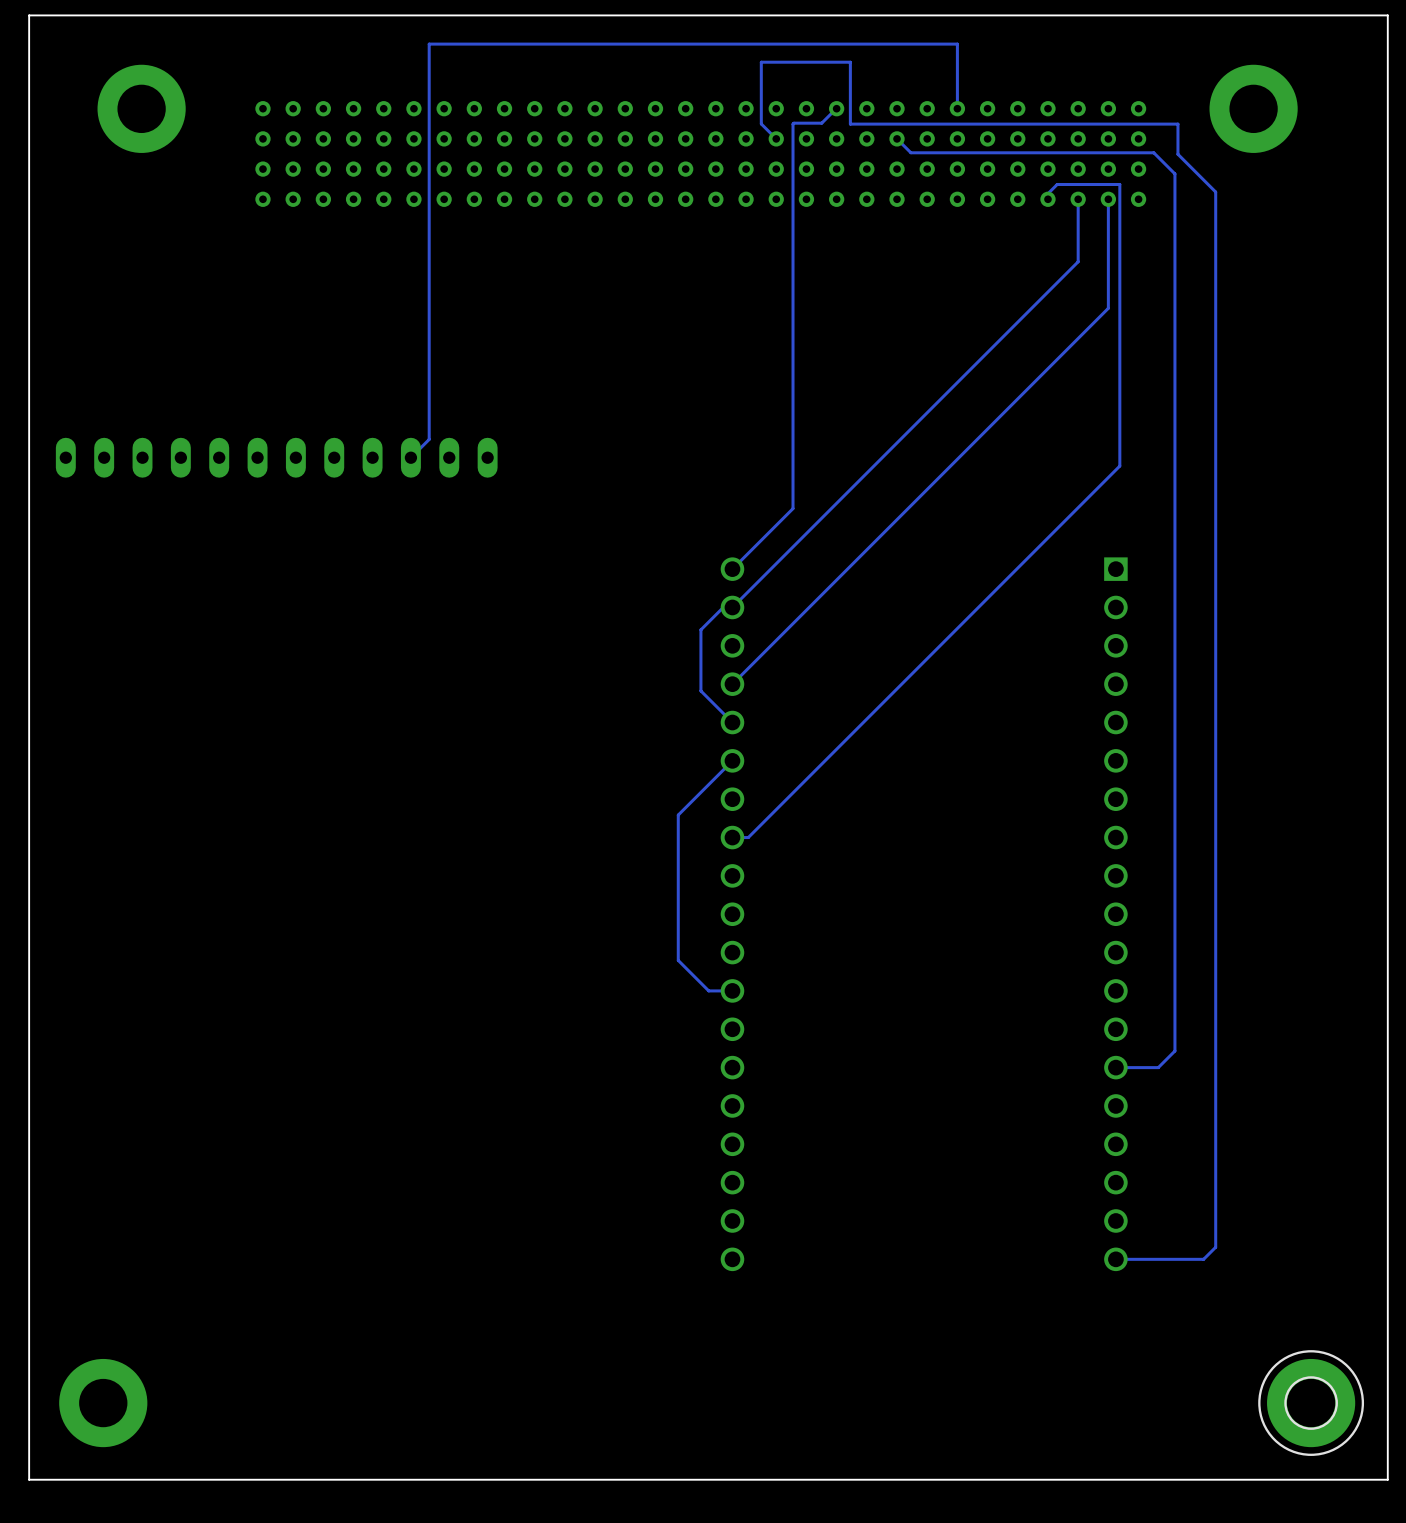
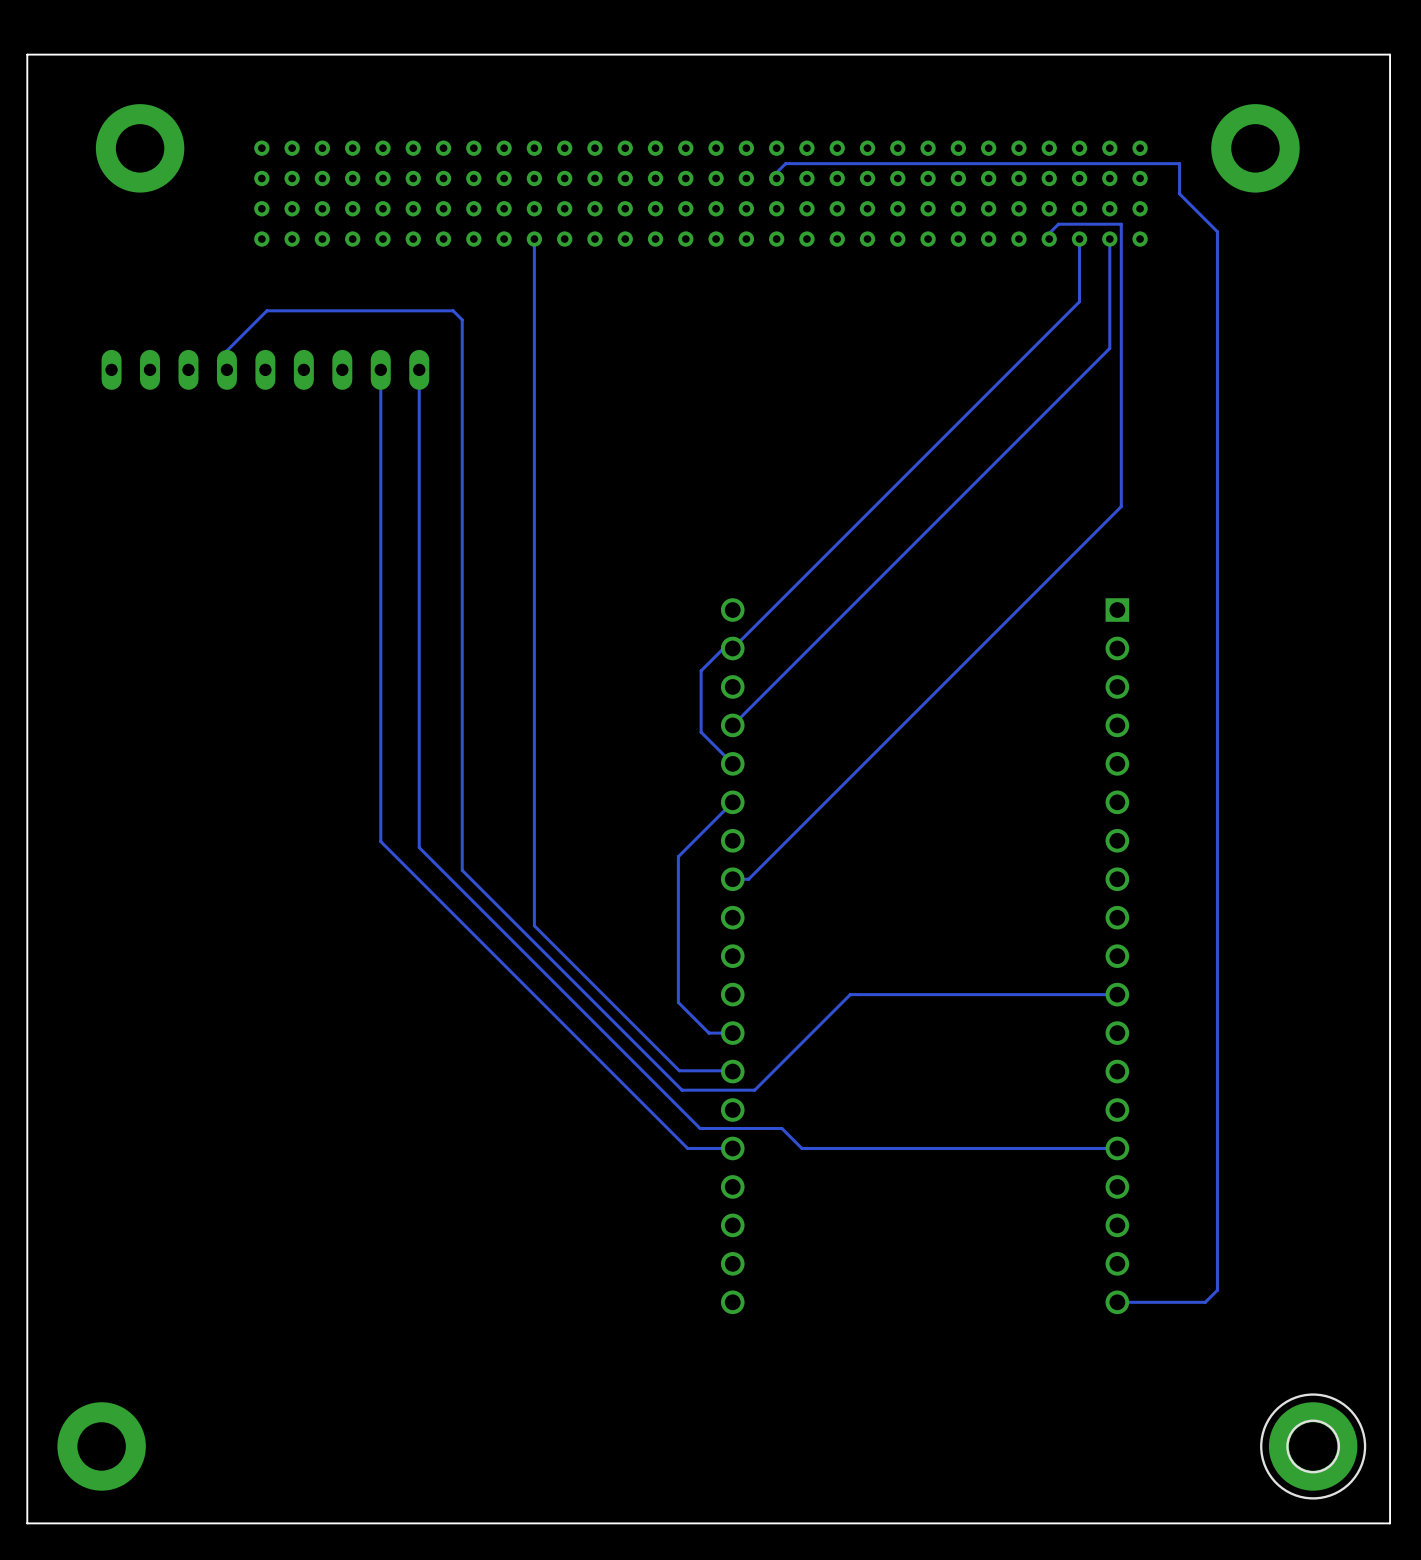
track: (836, 108) (821, 123) (793, 124) (793, 508) (732, 569) -> none
track: (957, 108) (957, 44) (429, 44) (429, 439) (410, 457) -> none
track: (850, 124) (850, 62) (761, 62) (761, 123) (776, 138) -> (851, 163) (785, 163) (776, 172) (776, 178)
track: (897, 138) (910, 152) (1153, 152) (1174, 173) (1174, 1051) (1158, 1067) (1115, 1067) -> none
track: none -> (534, 239) (534, 925) (679, 1070) (732, 1071)
track: none -> (226, 369) (226, 350) (266, 310) (453, 310) (462, 319) (462, 870) (682, 1090) (754, 1090) (850, 994) (1117, 994)
part: none -> (265, 369)
track: none -> (380, 369) (380, 841) (687, 1148) (732, 1148)
track: none -> (419, 369) (419, 847) (700, 1128) (781, 1128) (801, 1148) (1117, 1148)
part: (276, 457) -> none

